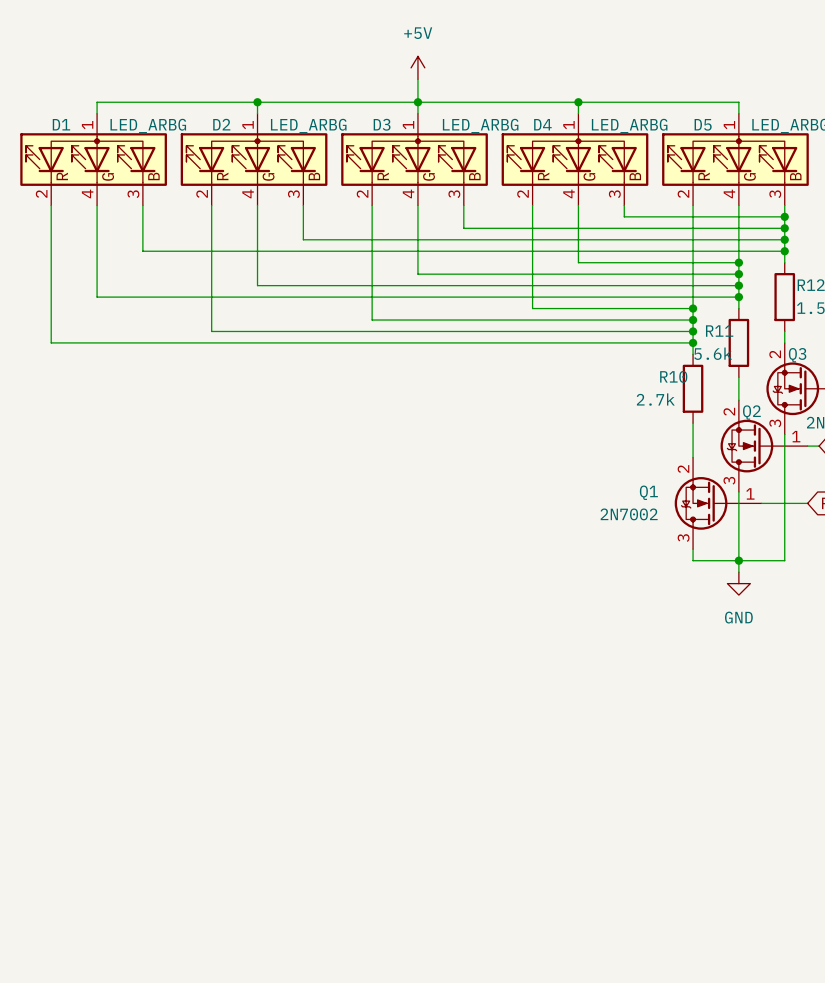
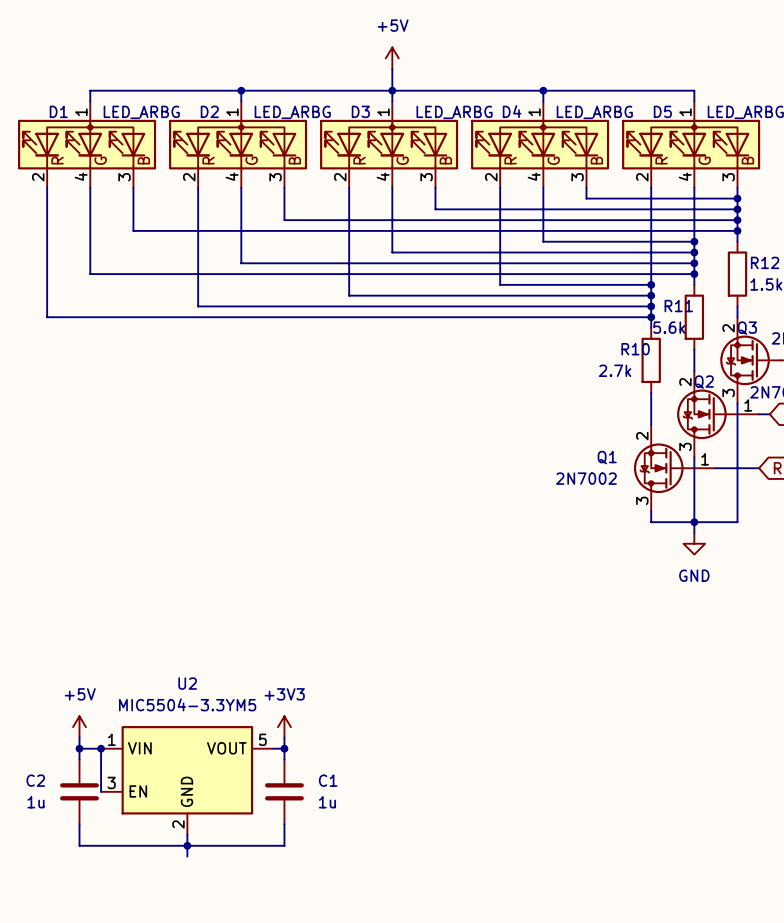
power symbol: none -> +5V (79, 727)
power symbol: none -> +3V3 (284, 727)
wire: none -> (79, 737) (79, 759)
wire: none -> (284, 737) (284, 759)
wire: none -> (79, 748) (101, 748) (101, 791)
junction: none -> (79, 748)
junction: none -> (101, 748)
wire: none -> (273, 748) (284, 748)
junction: none -> (284, 748)
U2: none -> MIC5504-3.3YM5 (187, 780)
C2: none -> 1u (79, 791)
C1: none -> 1u (284, 791)
wire: none -> (79, 824) (79, 845) (284, 845) (284, 824)
wire: none -> (187, 835) (187, 856)
junction: none -> (187, 845)

